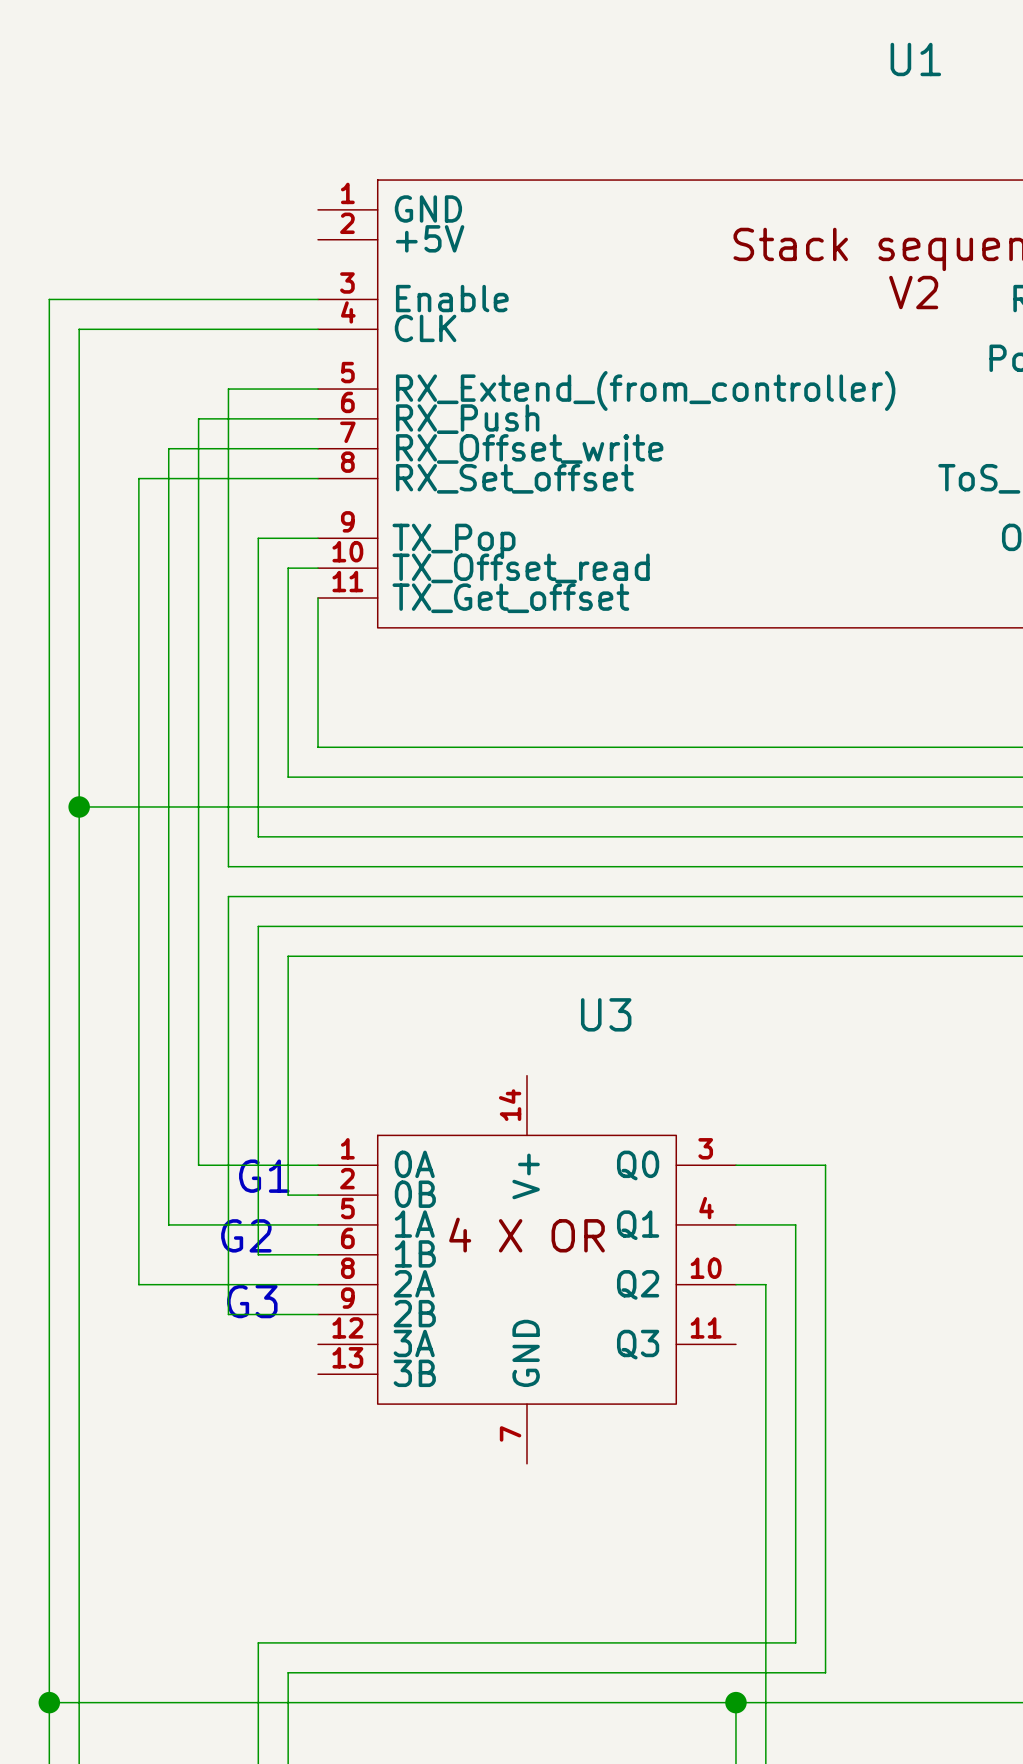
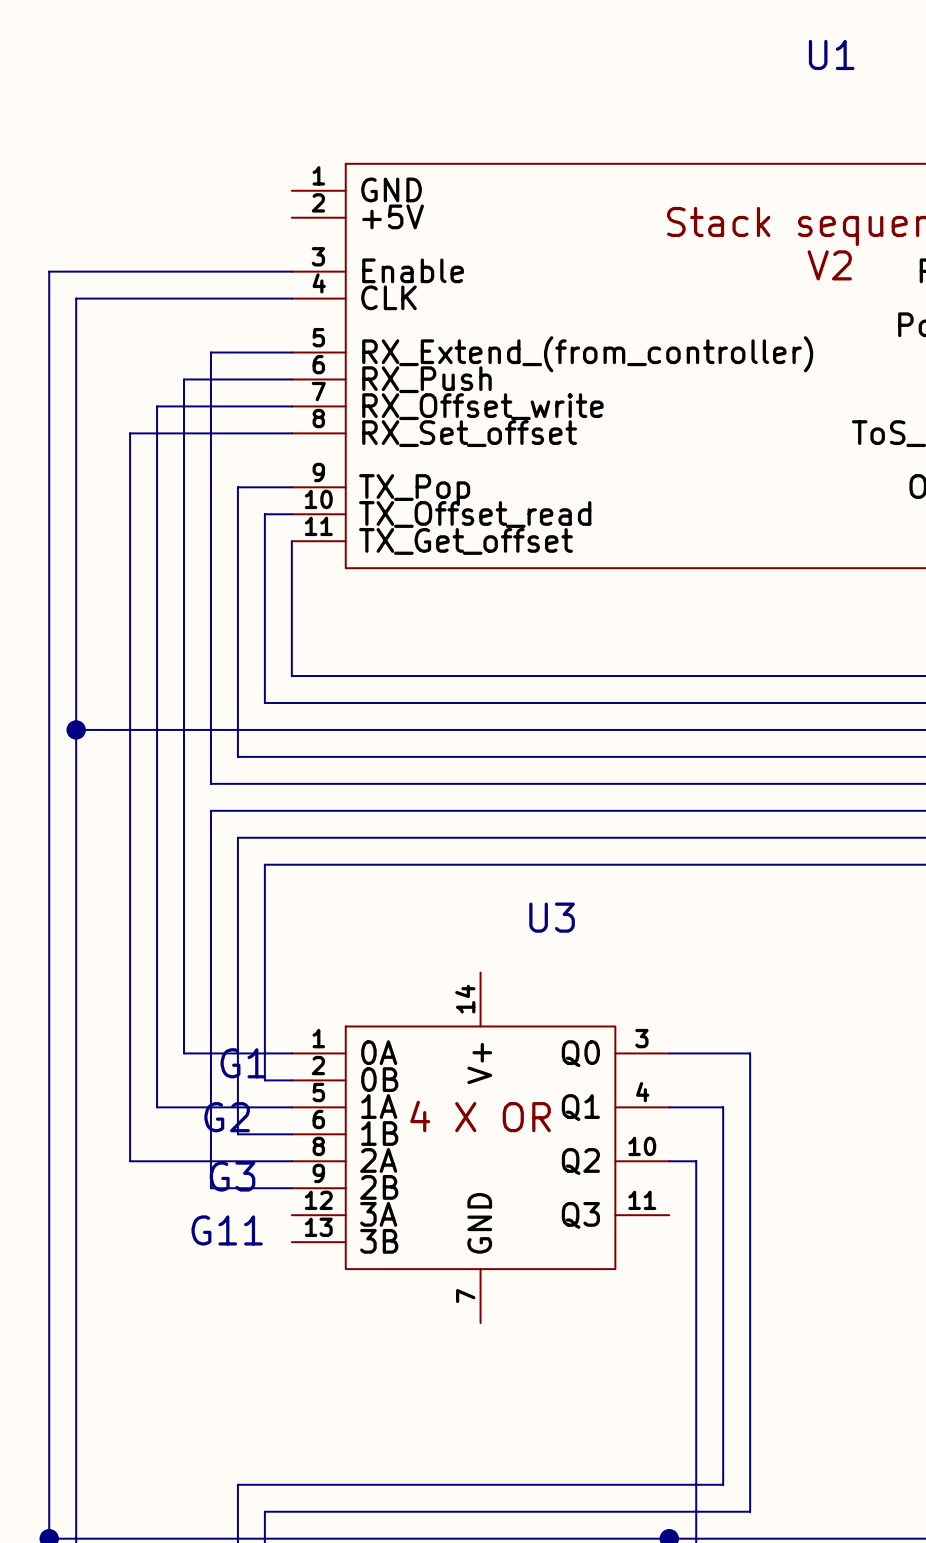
text: none -> G11 (227, 1230)

